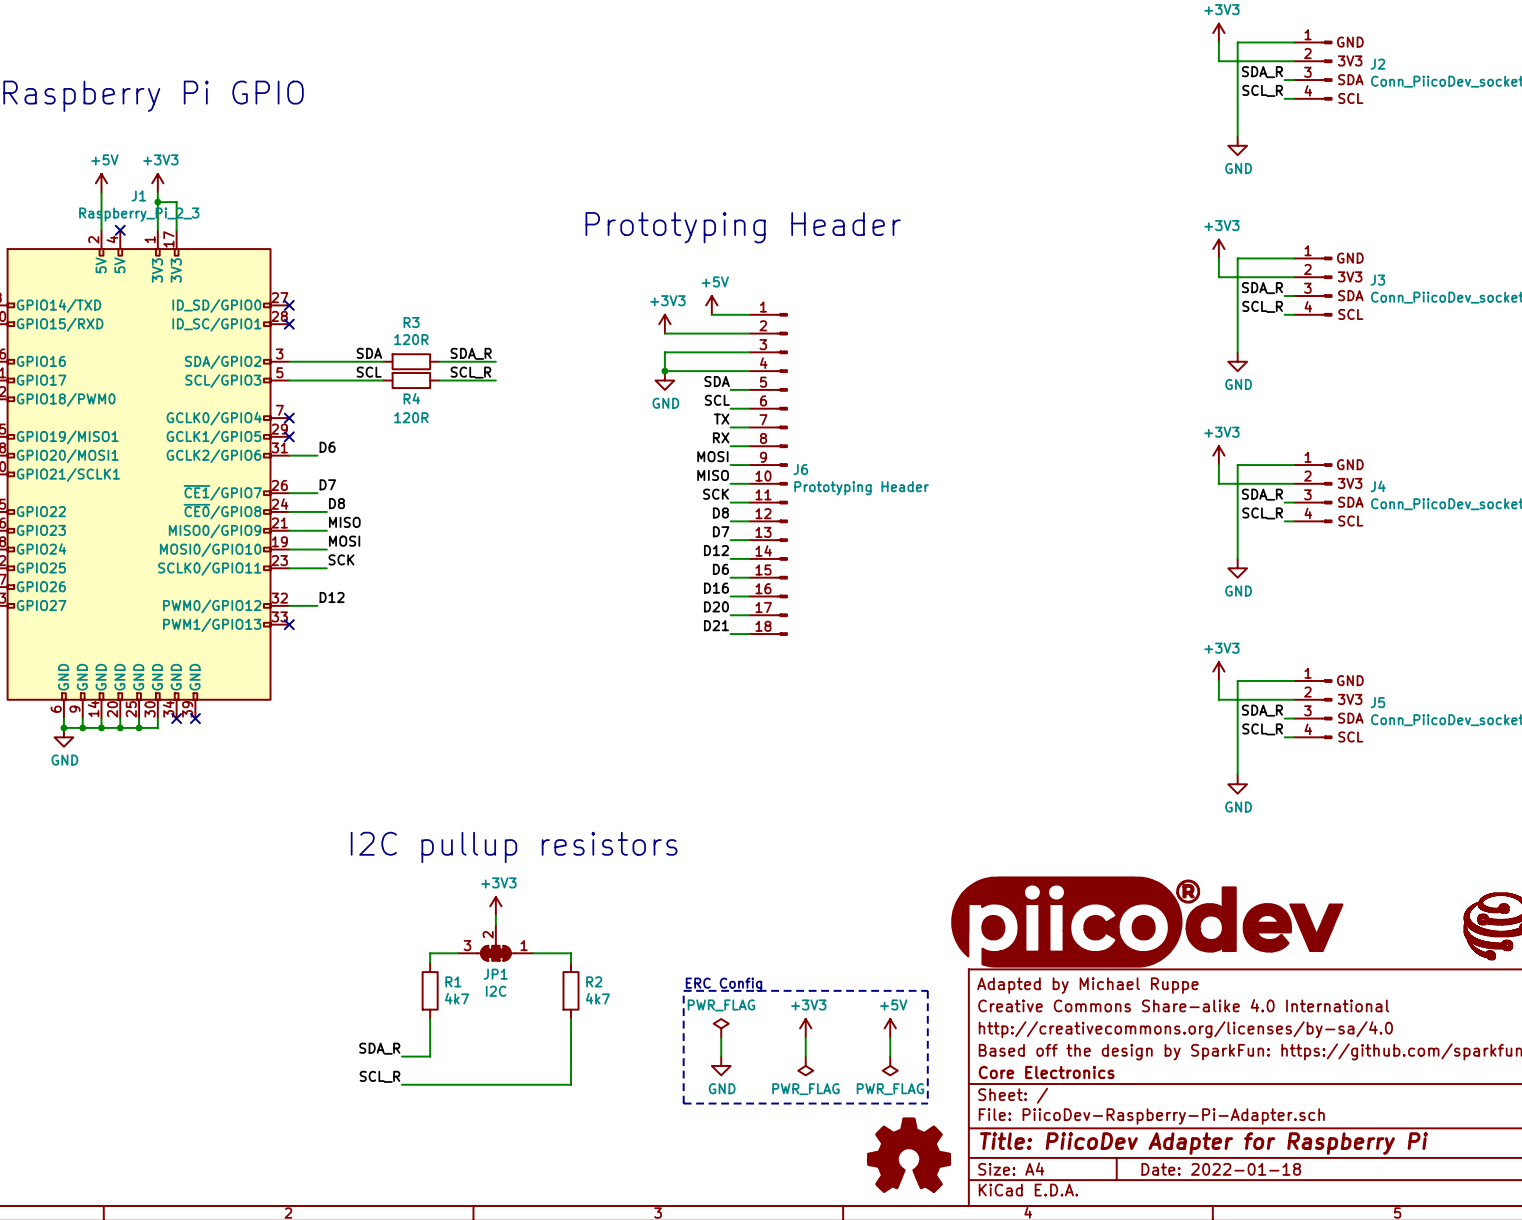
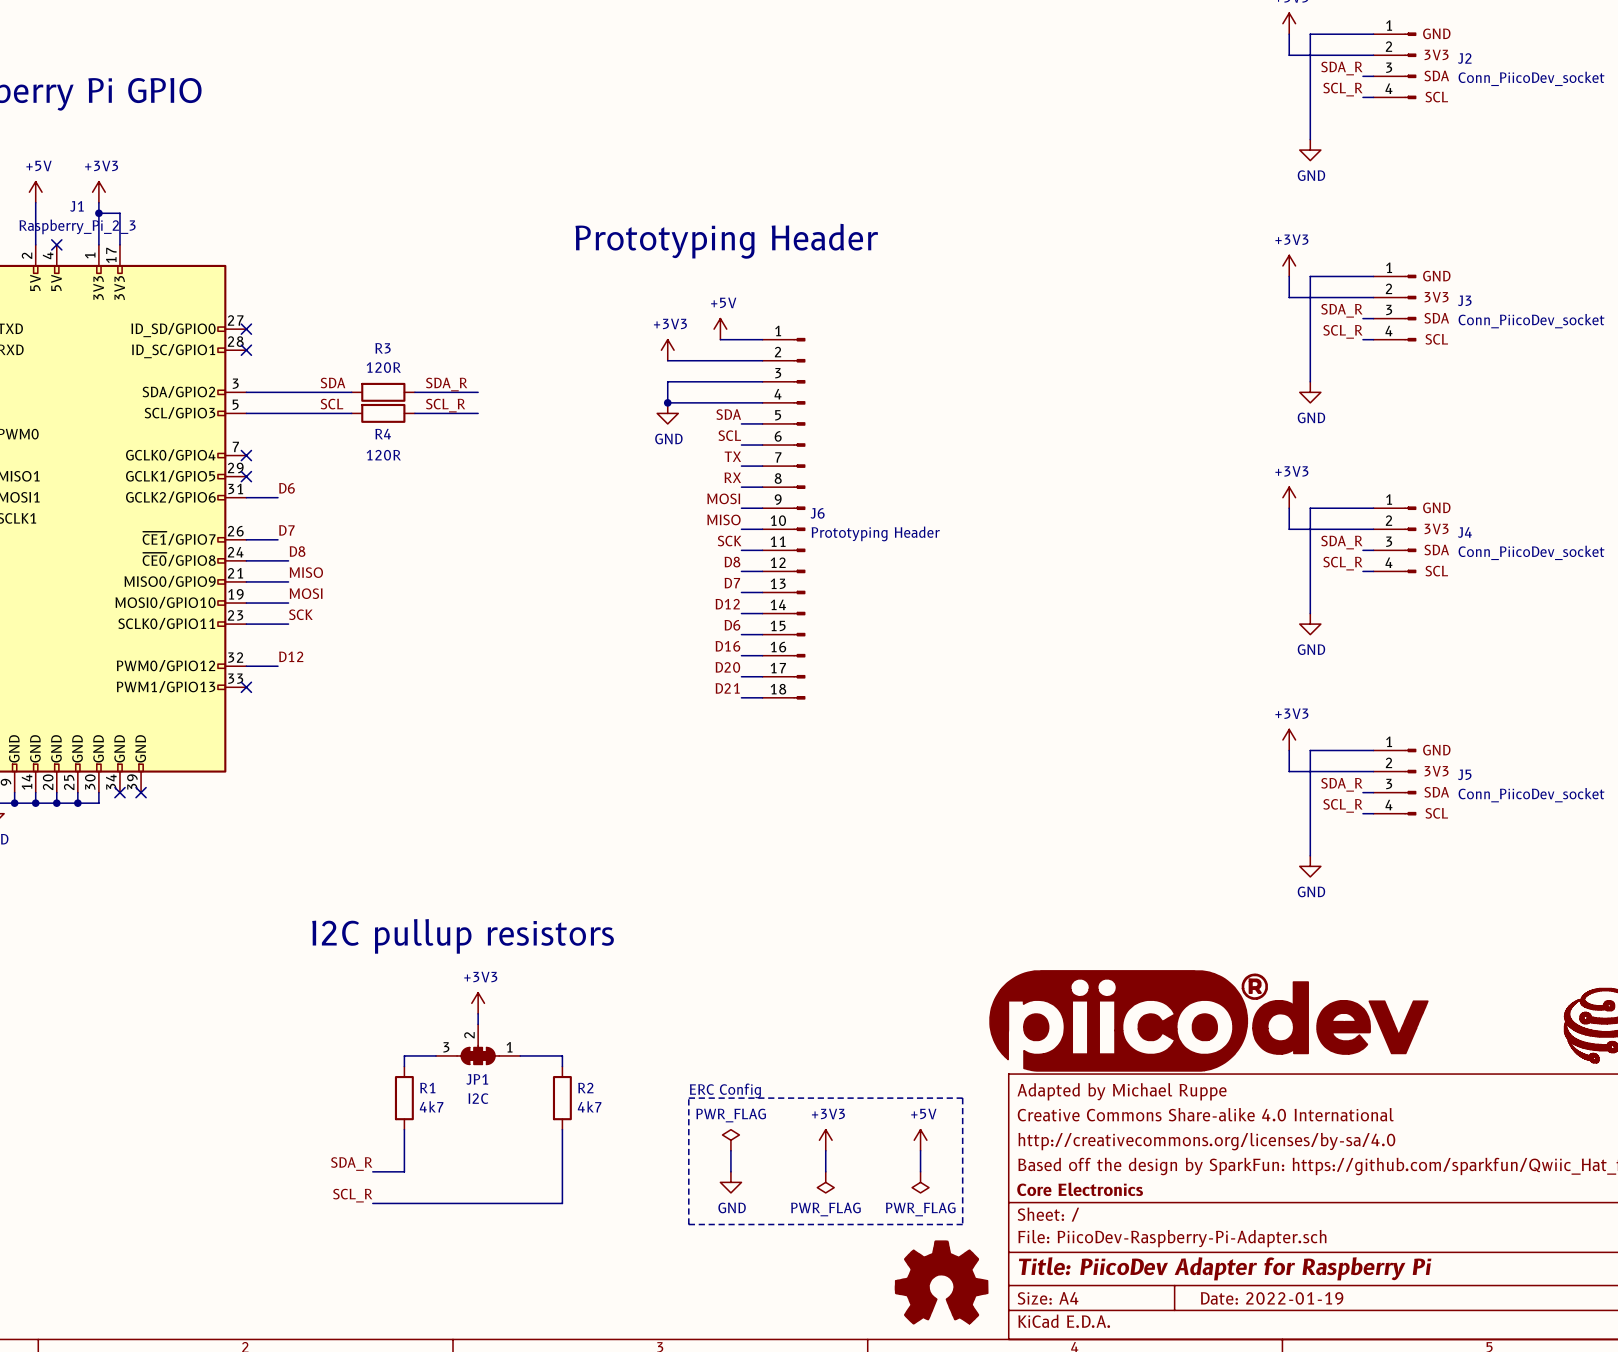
title block: Date: 2022-01-18 (1221, 1169) -> Date: 2022-01-19 (1272, 1298)

